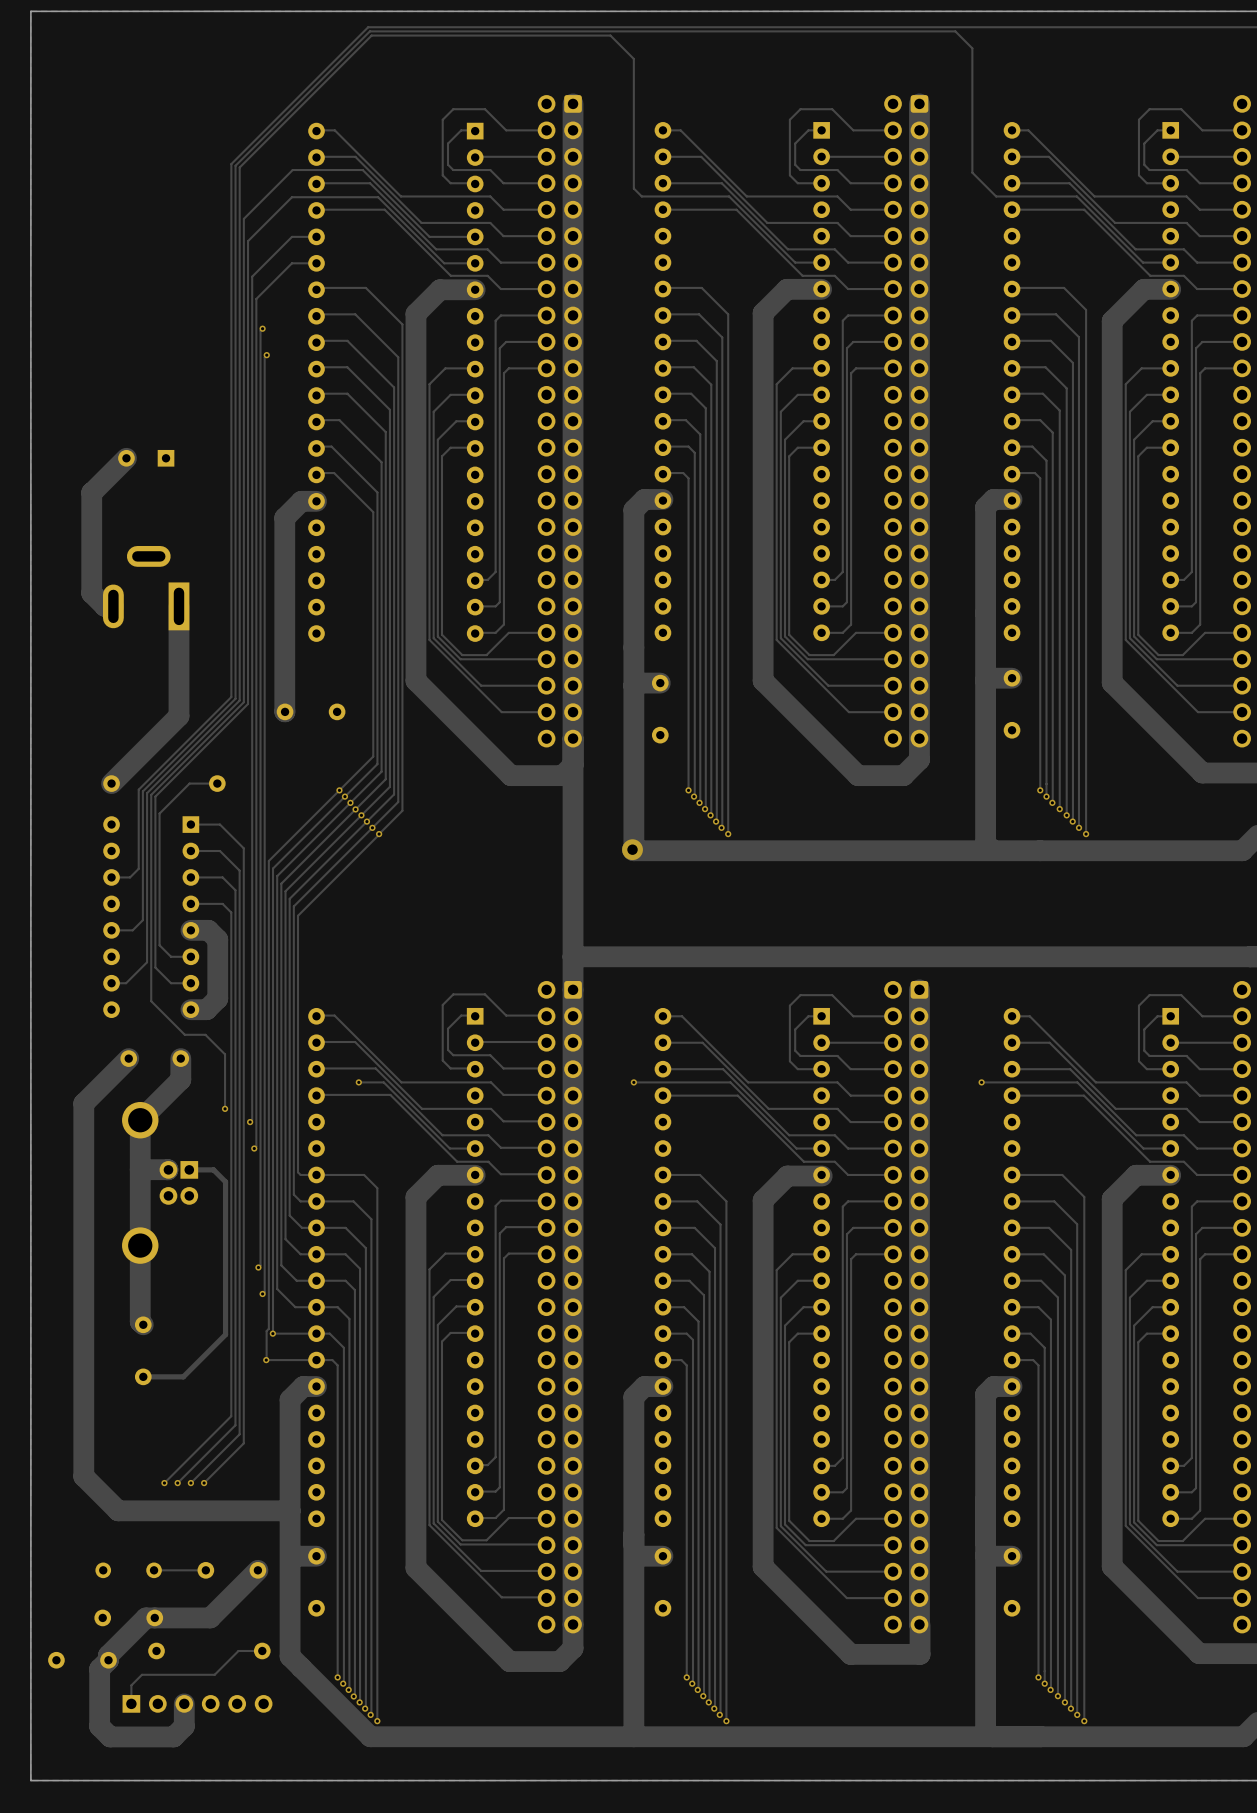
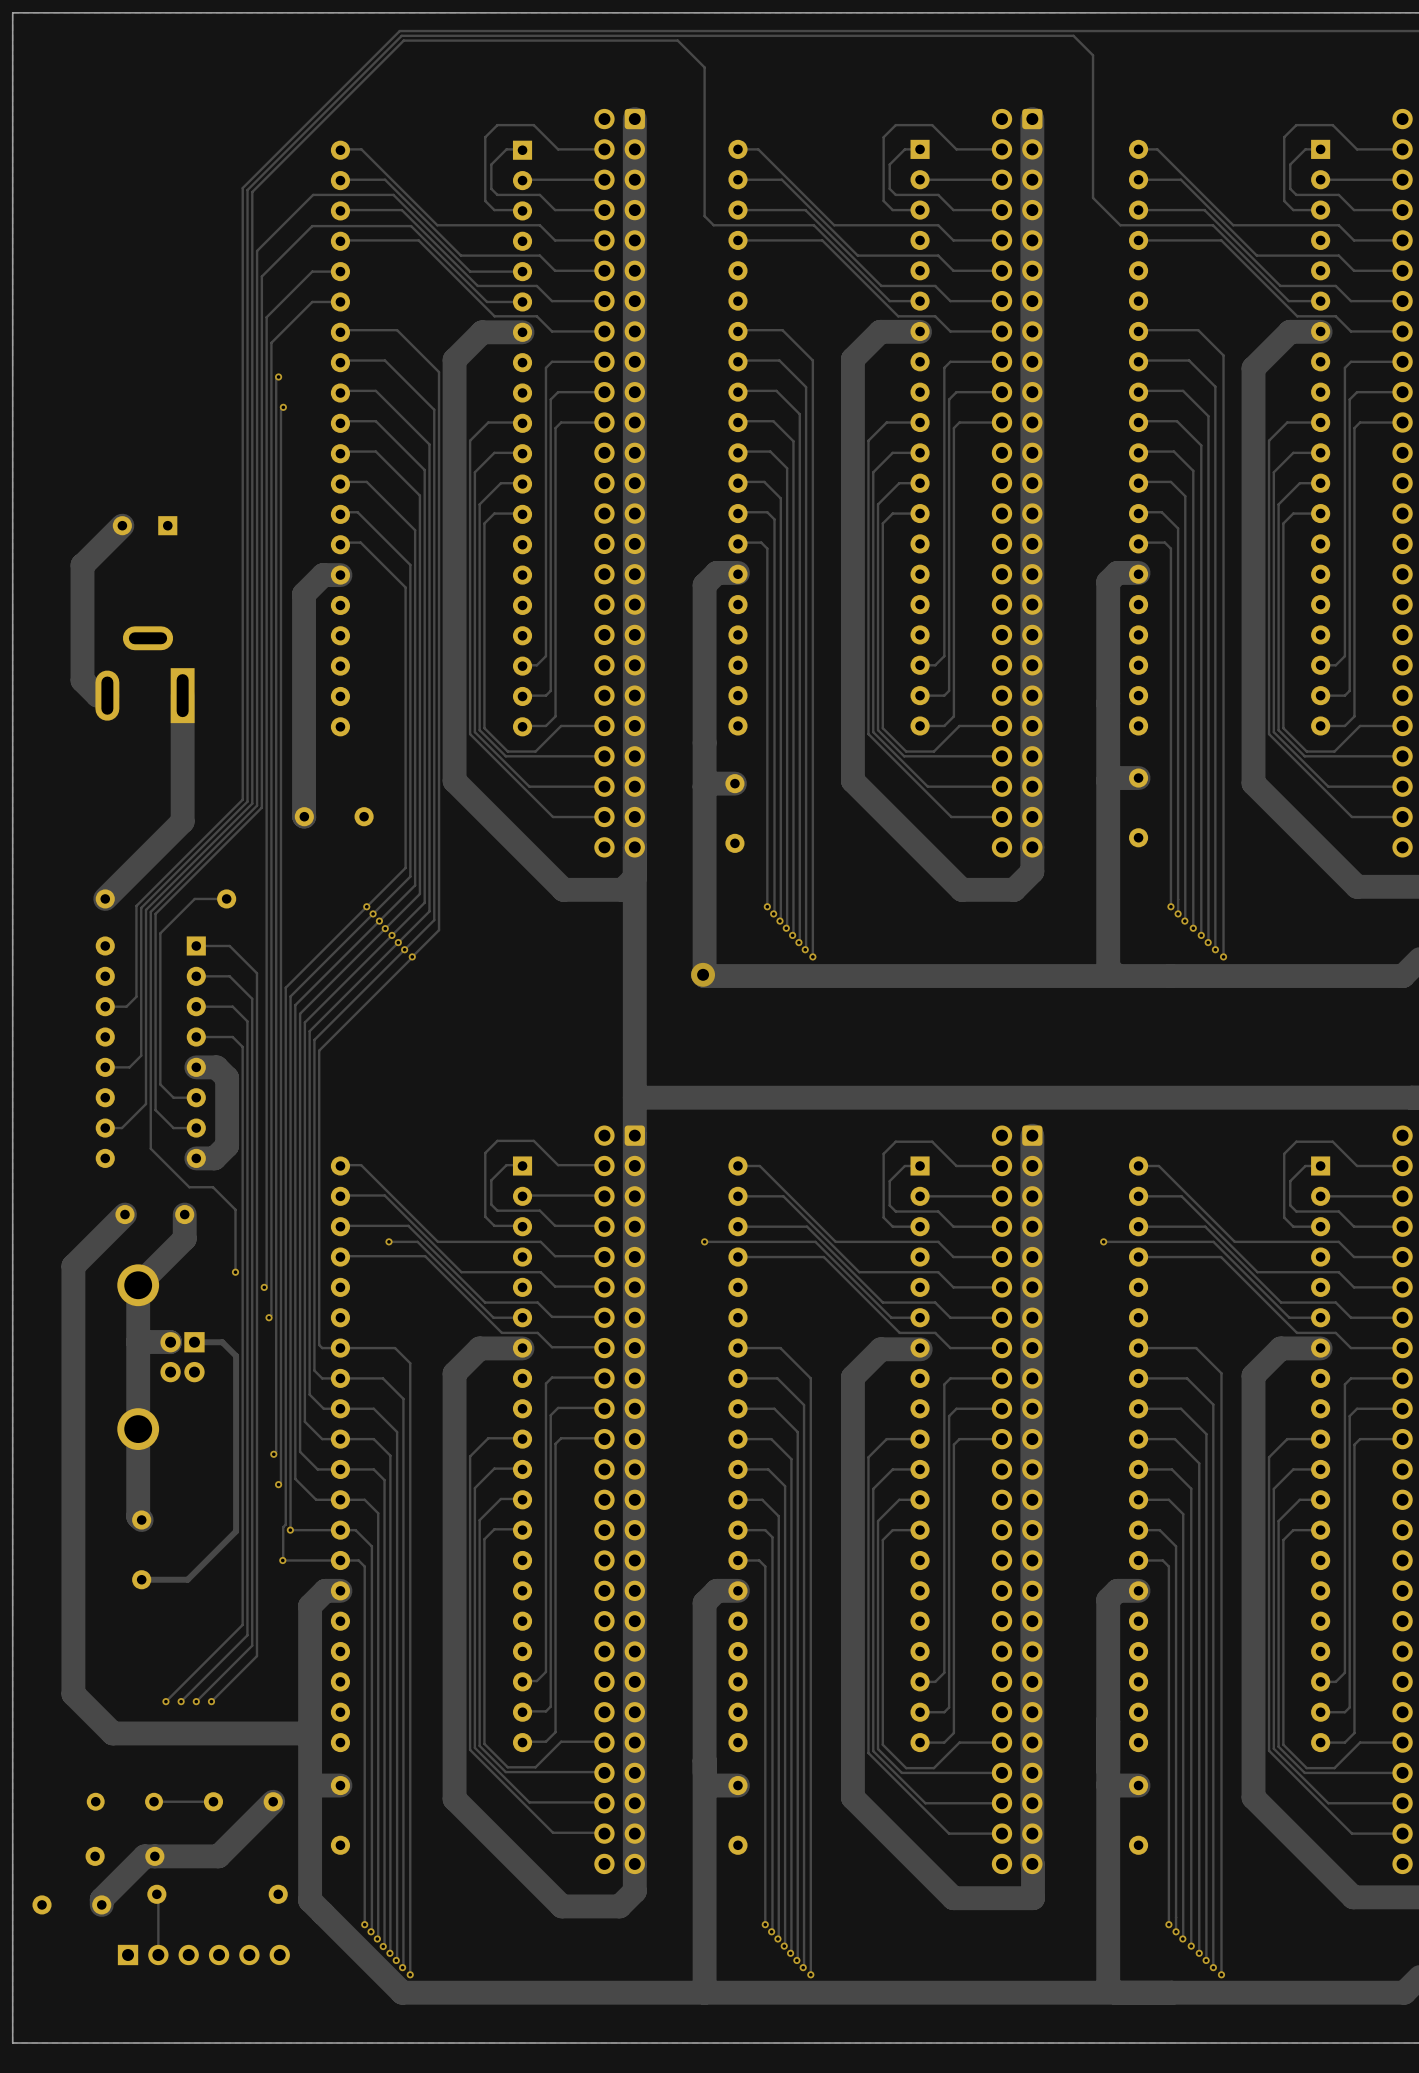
track: (262, 1650) (238, 1650) (214, 1674) (141, 1674) (131, 1685) (131, 1703) -> none
track: none -> (158, 1895) (158, 1960)
track: (108, 1660) (99, 1669) (99, 1726) (110, 1736) (173, 1736) (184, 1726) (184, 1703) -> none

